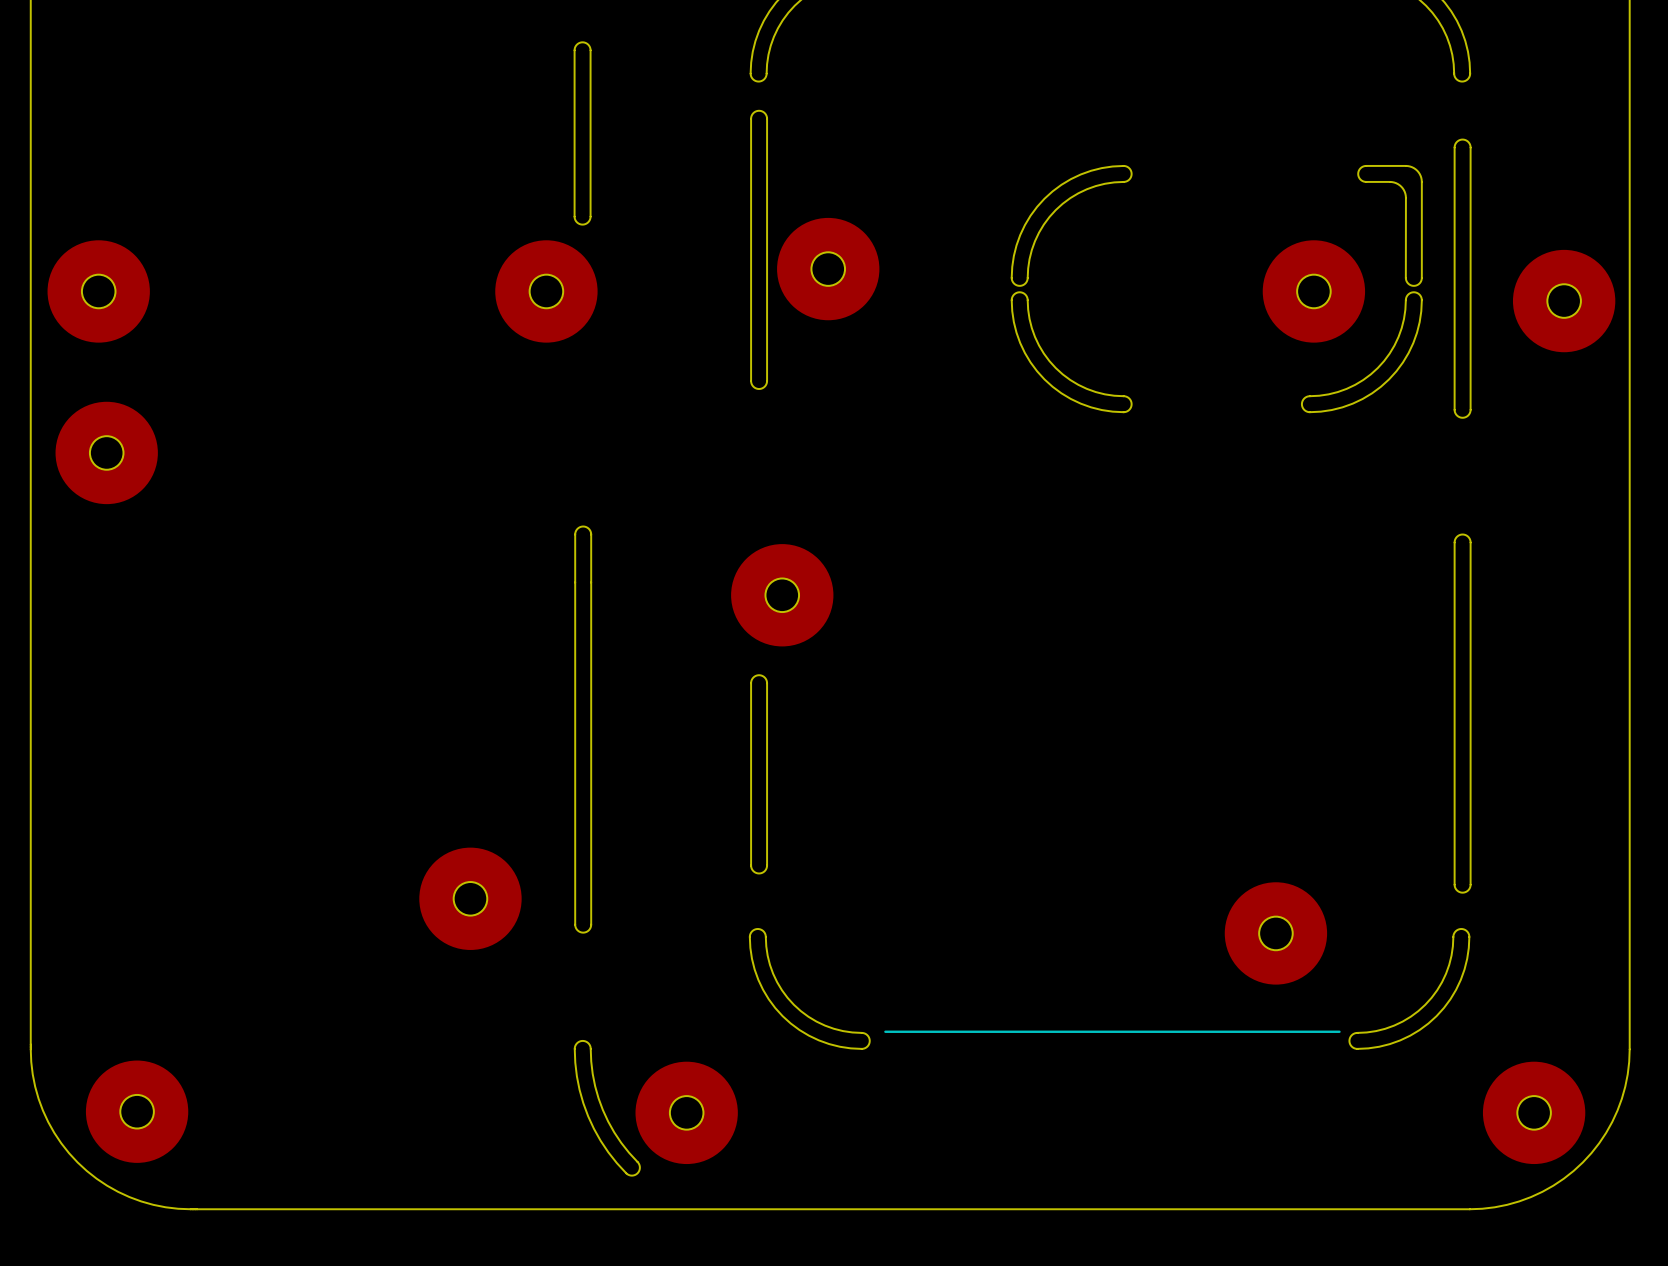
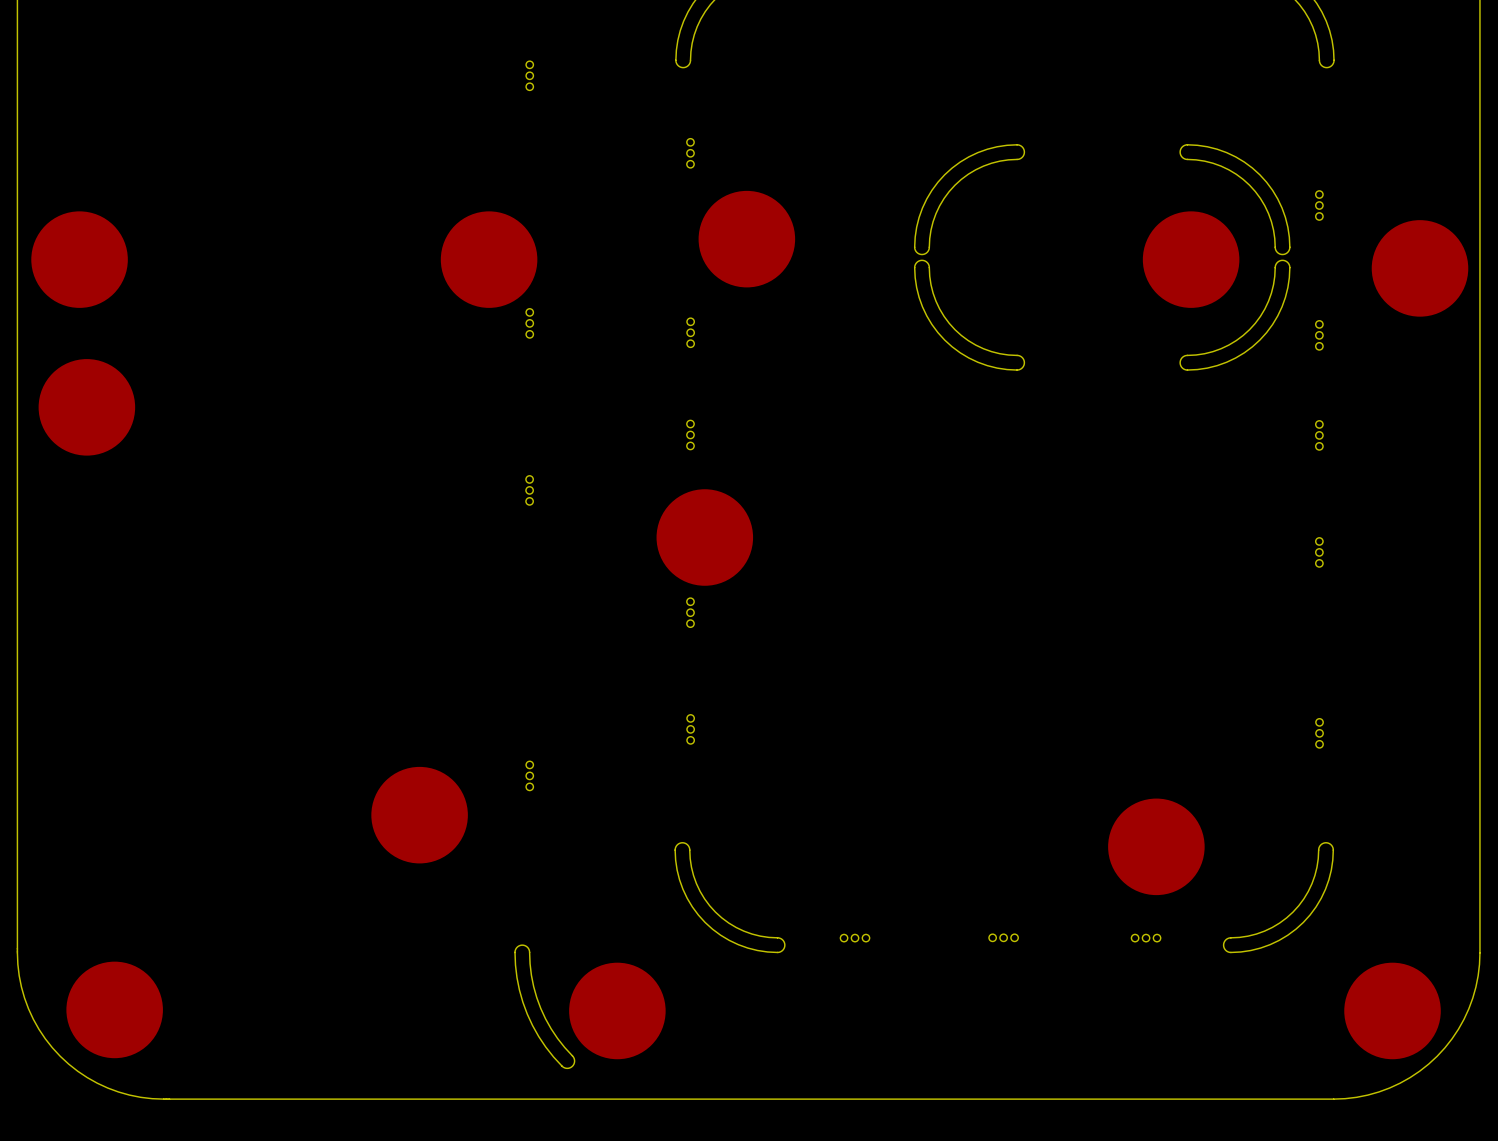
board edge: (574, 50) (574, 216) (576, 221) (582, 224) (587, 222) (590, 216) (590, 50) (588, 45) (582, 42) (576, 45) (574, 50) -> none
part: none -> (529, 75)
board edge: (751, 118) (751, 381) (753, 386) (759, 388) (764, 386) (767, 381) (767, 118) (764, 112) (759, 110) (753, 112) (751, 118) -> none
board edge: (1454, 147) (1454, 409) (1457, 415) (1462, 417) (1468, 415) (1470, 409) (1470, 147) (1467, 141) (1462, 139) (1456, 142) (1454, 147) -> none
part: none -> (690, 153)
part footprint: [777, 217, 880, 321] -> [698, 190, 796, 288]
part: none -> (1319, 205)
part footprint: [47, 240, 150, 343] -> [31, 211, 128, 308]
part footprint: [495, 240, 598, 343] -> [440, 211, 538, 308]
part footprint: [1262, 240, 1366, 343] -> [1142, 211, 1240, 308]
part footprint: [1512, 249, 1616, 353] -> [1371, 220, 1469, 317]
board edge: (1405, 277) (1404, 191) (1401, 186) (1394, 182) (1362, 180) (1358, 173) (1363, 166) (1408, 166) (1413, 168) (1419, 174) (1421, 182) (1421, 277) -> (1275, 247) (1273, 230) (1268, 213) (1260, 198) (1249, 185) (1236, 174) (1221, 166) (1204, 161) (1183, 158) (1180, 153) (1182, 146) (1186, 144) (1197, 145) (1226, 152) (1244, 162) (1259, 174) (1272, 190) (1282, 208) (1287, 227) (1289, 247)
part: none -> (529, 323)
part: none -> (690, 332)
part: none -> (1319, 335)
part footprint: [55, 401, 158, 505] -> [38, 359, 136, 456]
part: none -> (690, 434)
part: none -> (1319, 435)
board edge: (575, 534) (575, 924) (577, 930) (583, 932) (589, 929) (591, 924) (591, 534) (588, 528) (583, 526) (577, 529) (575, 534) -> none
board edge: (1454, 542) (1454, 884) (1456, 889) (1462, 892) (1468, 889) (1470, 884) (1470, 542) (1467, 536) (1462, 534) (1457, 536) (1454, 542) -> none
part: none -> (529, 490)
part footprint: [731, 544, 834, 647] -> [656, 489, 754, 586]
part: none -> (1319, 552)
part: none -> (690, 612)
board edge: (751, 683) (751, 865) (753, 870) (759, 873) (764, 871) (767, 865) (767, 683) (764, 677) (759, 675) (753, 677) (751, 683) -> none
part: none -> (690, 729)
part: none -> (1319, 733)
part footprint: [419, 847, 522, 950] -> [371, 766, 468, 864]
part: none -> (529, 775)
part footprint: [1224, 882, 1328, 985] -> [1108, 798, 1205, 896]
line: (885, 1031) (1339, 1031) -> none
part: none -> (1003, 937)
part: none -> (855, 938)
part: none -> (1146, 938)
part footprint: [85, 1060, 189, 1163] -> [66, 961, 163, 1059]
part footprint: [635, 1061, 738, 1165] -> [569, 962, 666, 1060]
part footprint: [1482, 1061, 1586, 1165] -> [1344, 962, 1441, 1060]

